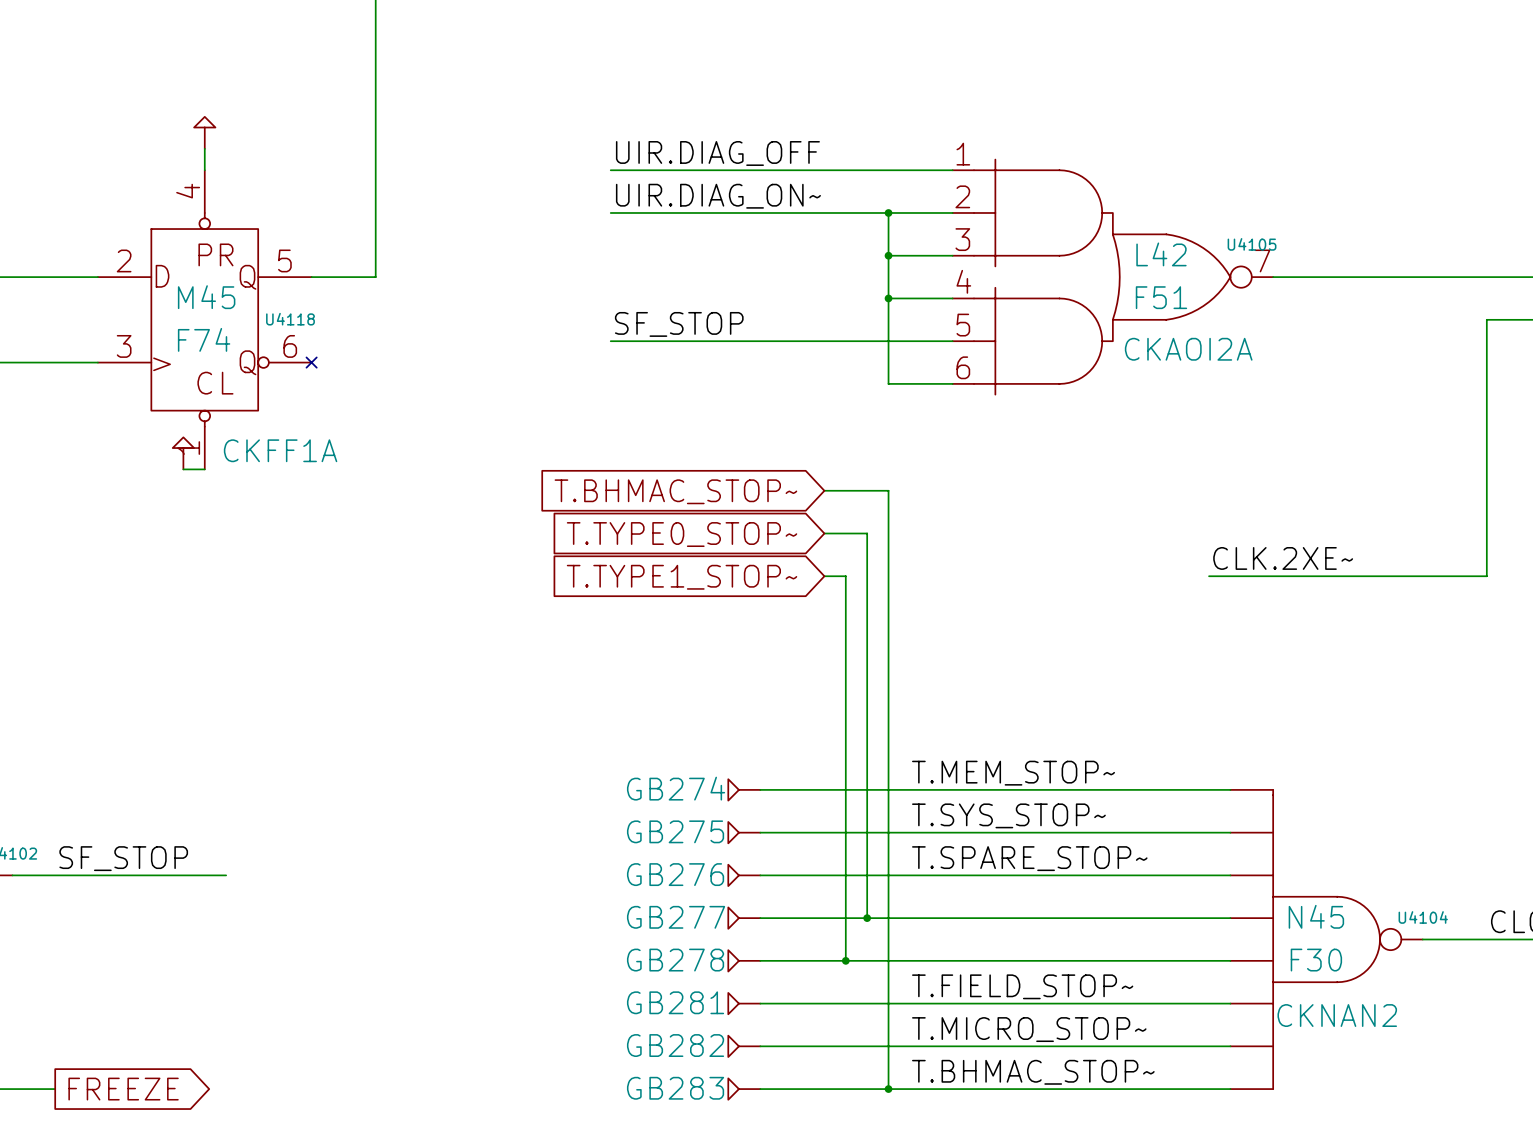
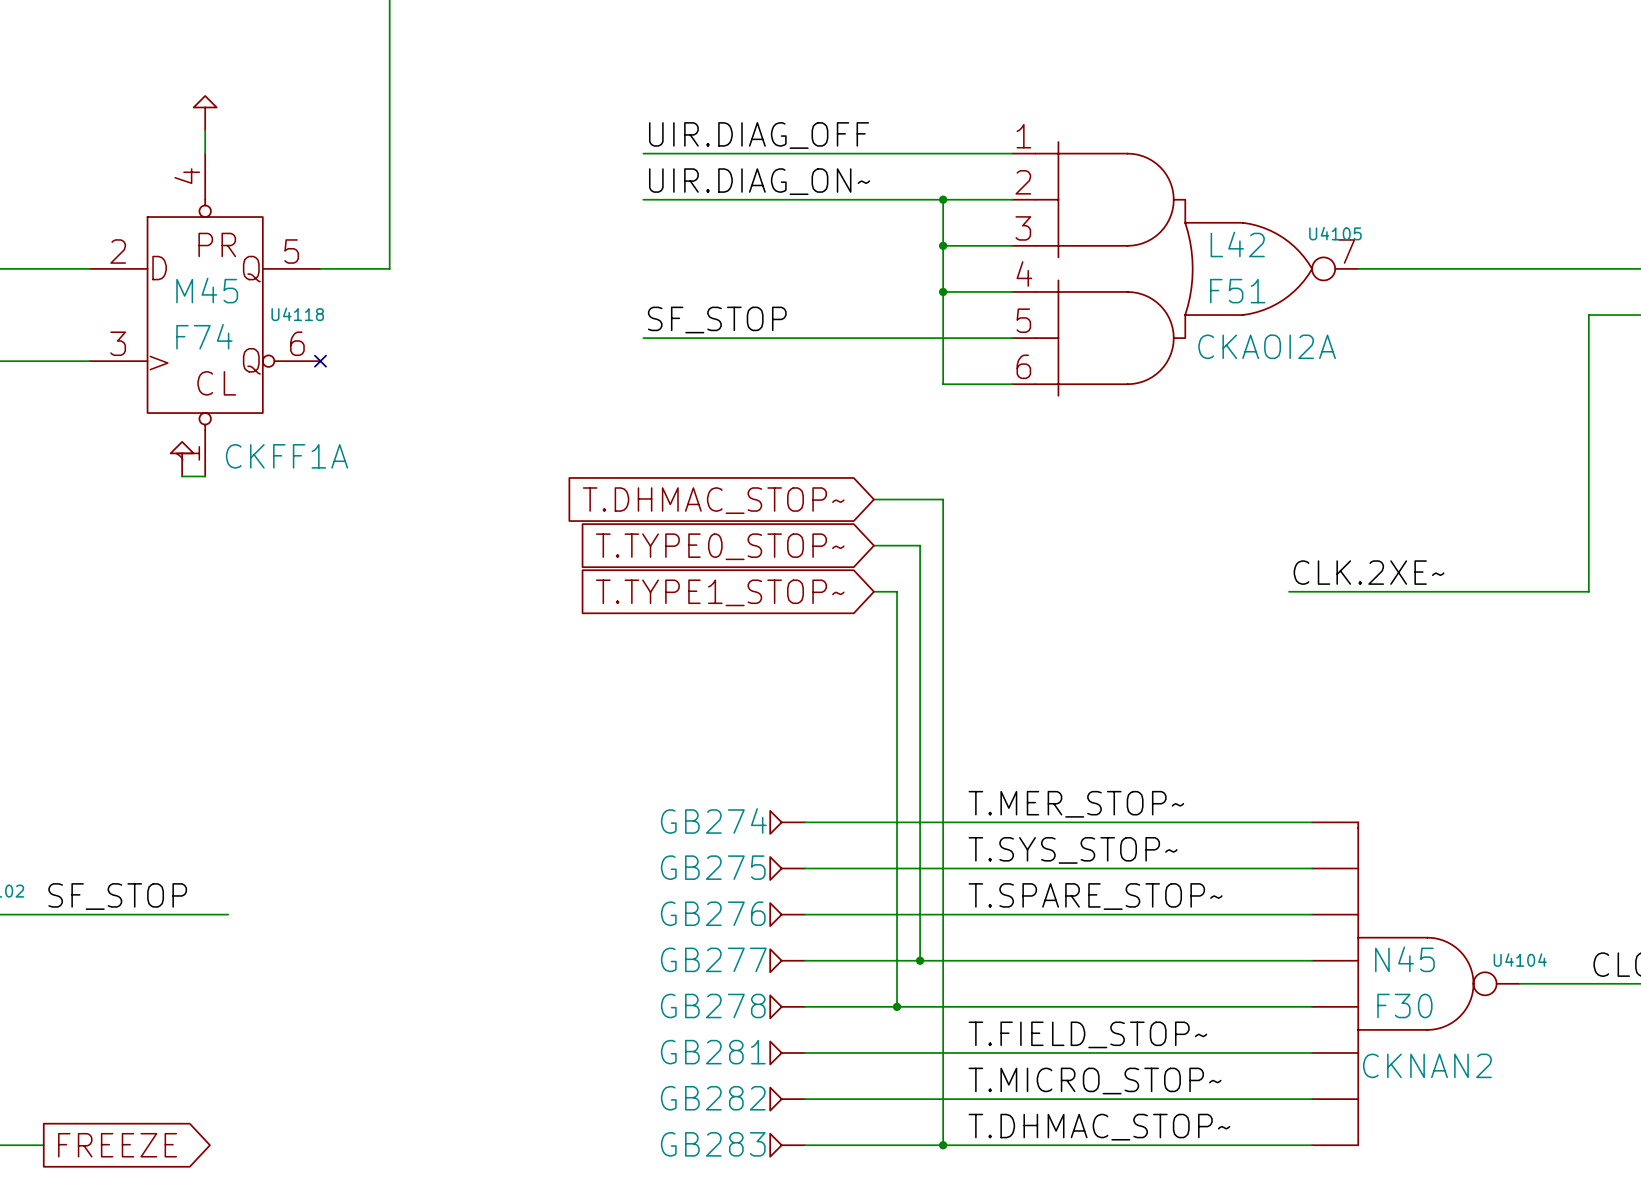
global label: T.BHMAC_STOP~ (675, 491) -> T.DHMAC_STOP~ (713, 500)
label: T.MEM_STOP~ (1013, 773) -> T.MER_STOP~ (1076, 804)
label: T.BHMAC_STOP~ (1033, 1072) -> T.DHMAC_STOP~ (1099, 1127)

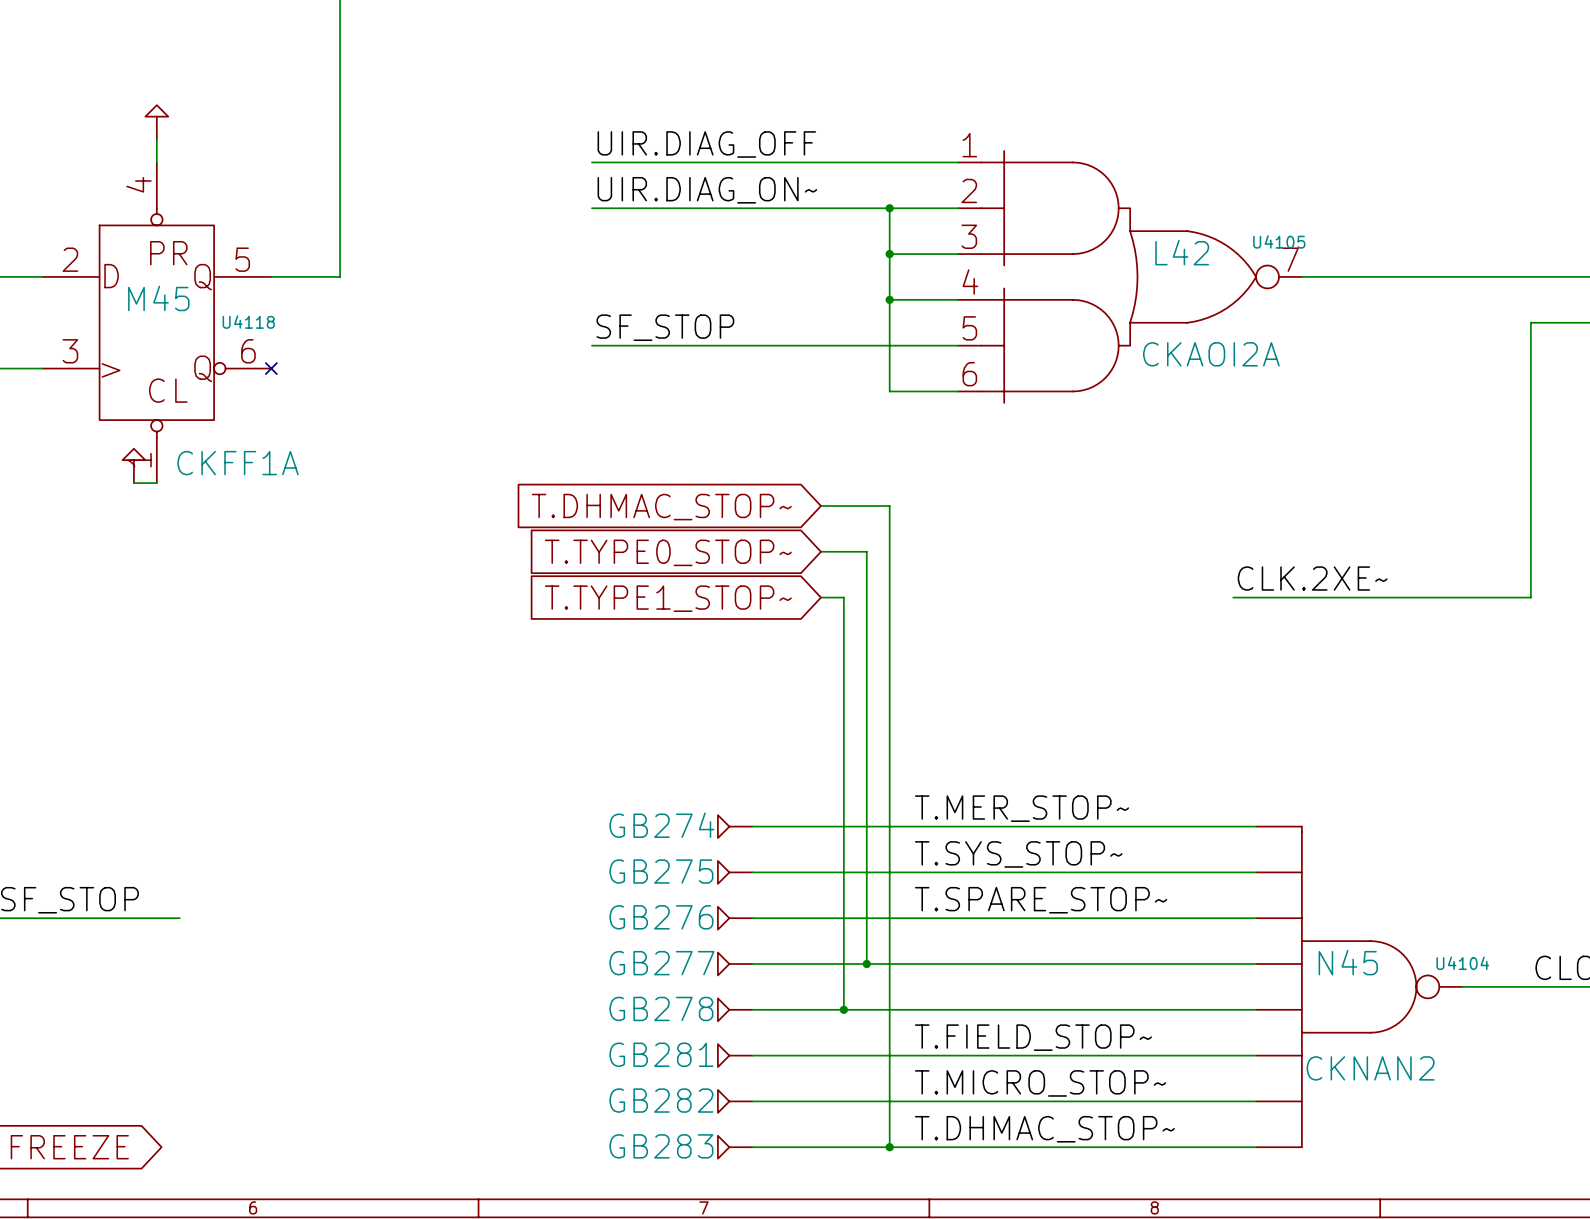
U4105 value: F51 (1237, 291) -> none
U4118 value: F74 (204, 336) -> none
U4104 value: F30 (1404, 1006) -> none

